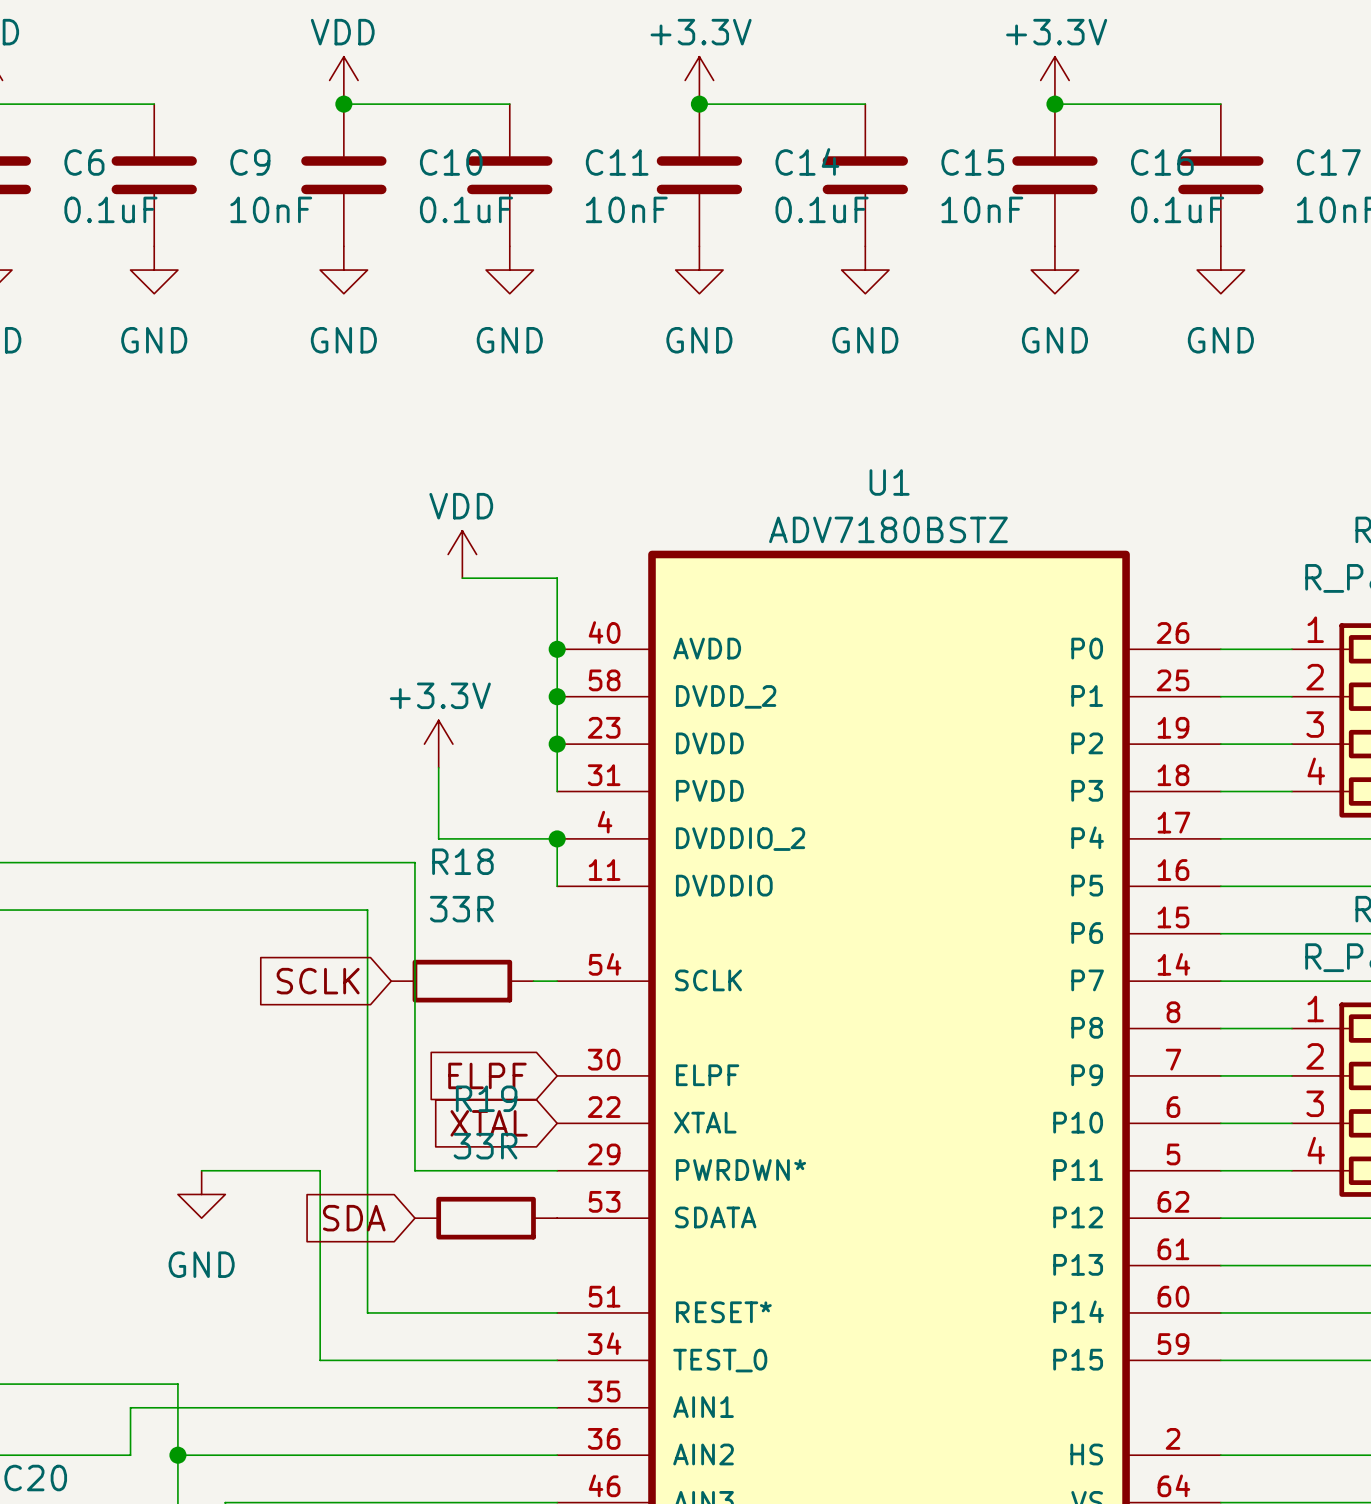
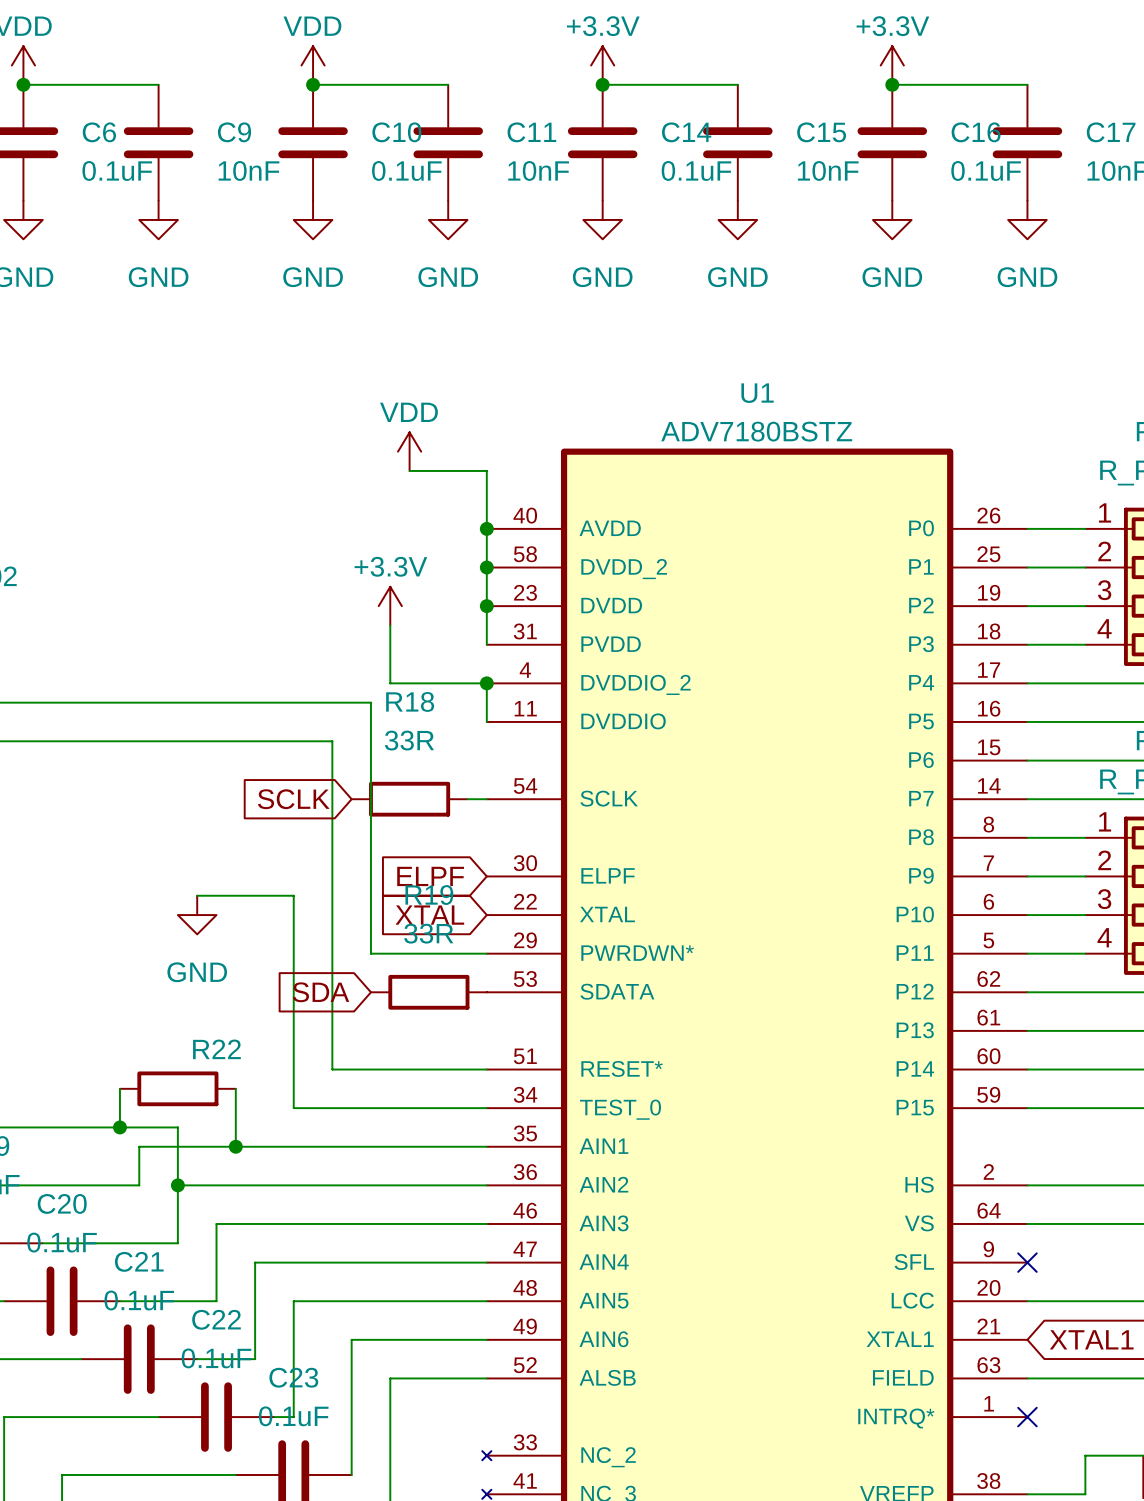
wire: (201, 1170) (320, 1170) -> (197, 895) (293, 895) (293, 953)
power symbol position: GND (201, 1194) -> GND (197, 915)
wire: none -> (119, 1088) (119, 1127)
R22: none -> (177, 1088)
wire: none -> (235, 1088) (235, 1146)
junction: none -> (119, 1127)
junction: none -> (235, 1146)

